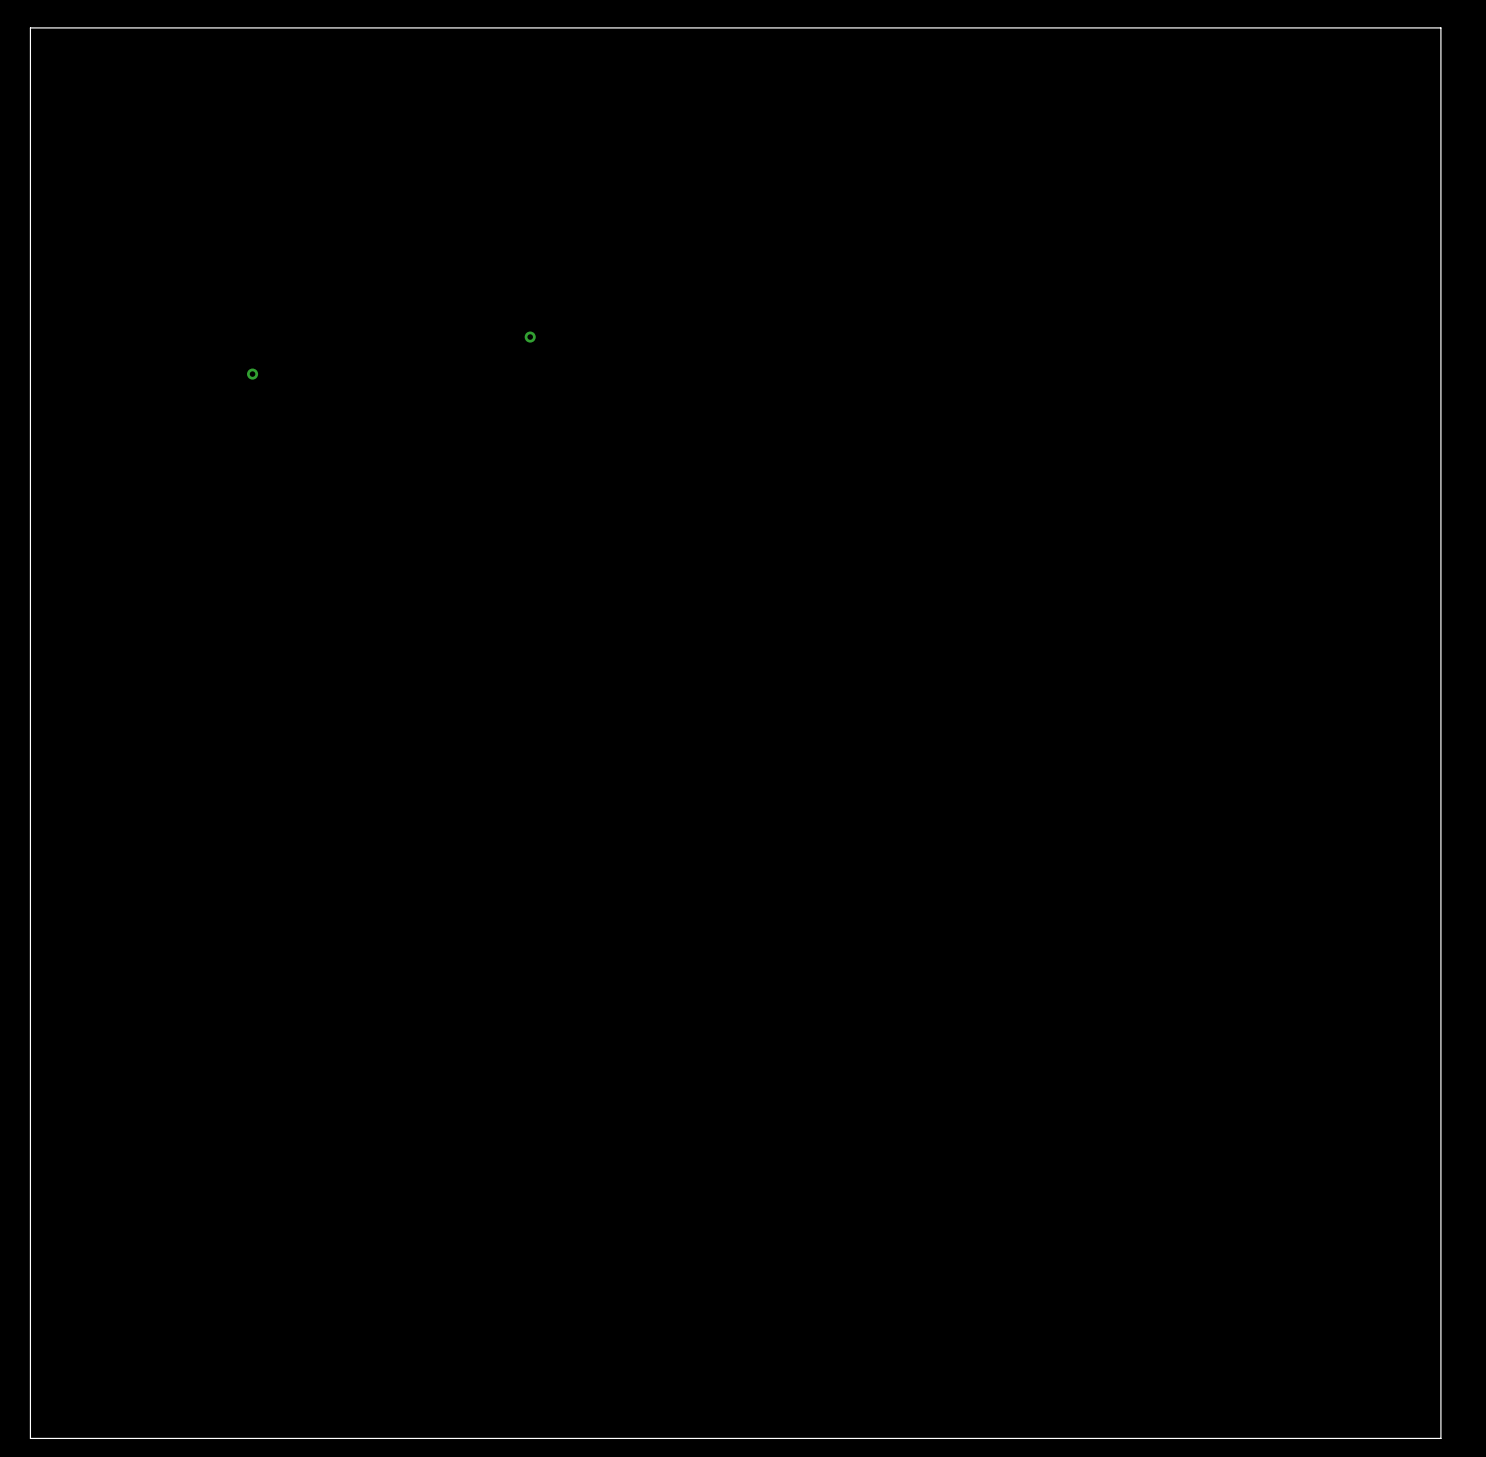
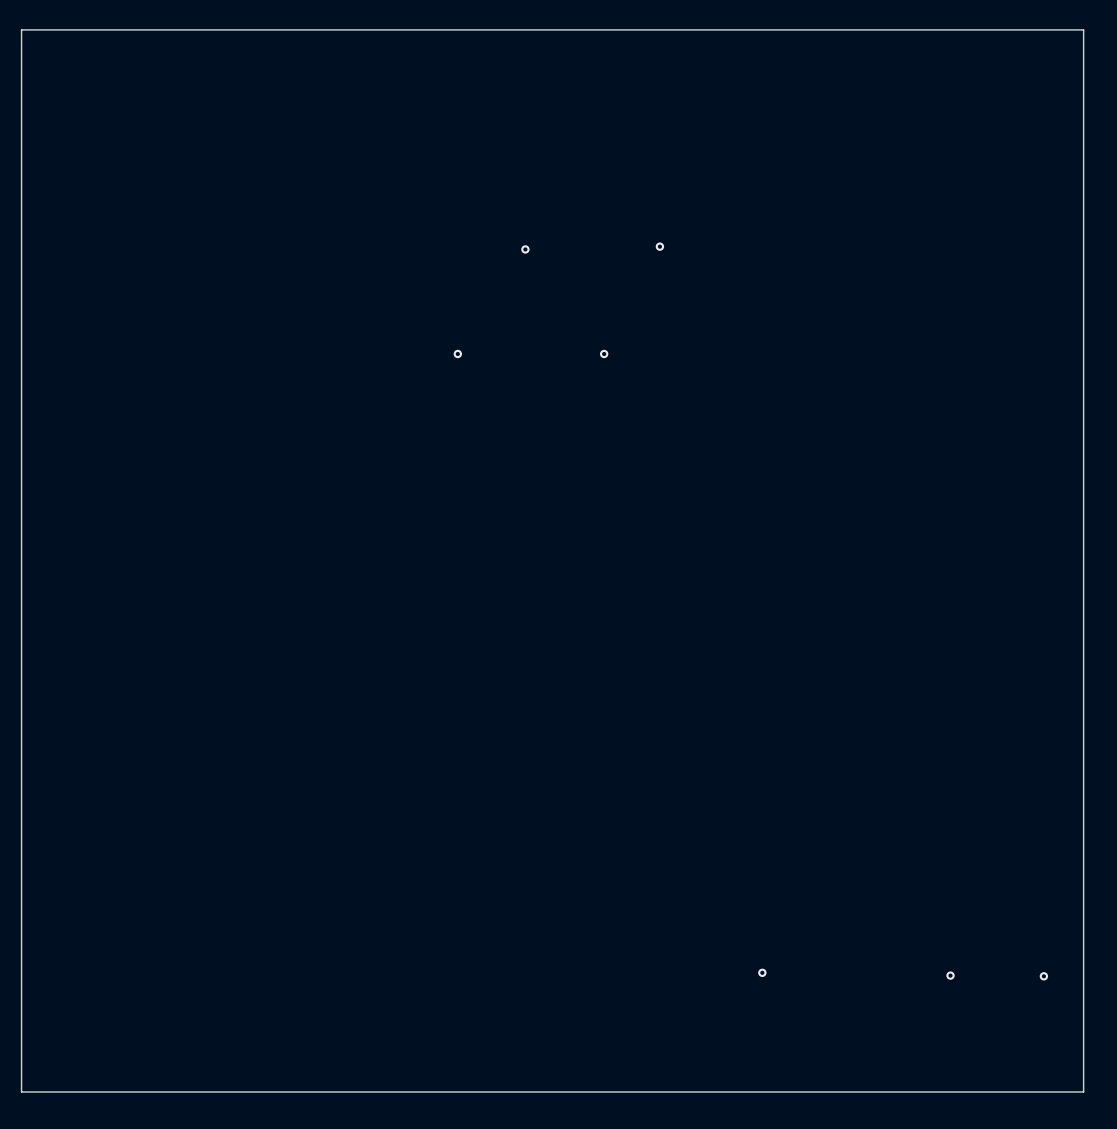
via: none -> (659, 246)
via: none -> (525, 249)
via: (530, 337) -> none
via: (252, 374) -> none
via: none -> (457, 353)
via: none -> (604, 353)
via: none -> (762, 972)
via: none -> (950, 975)
via: none -> (1043, 976)

